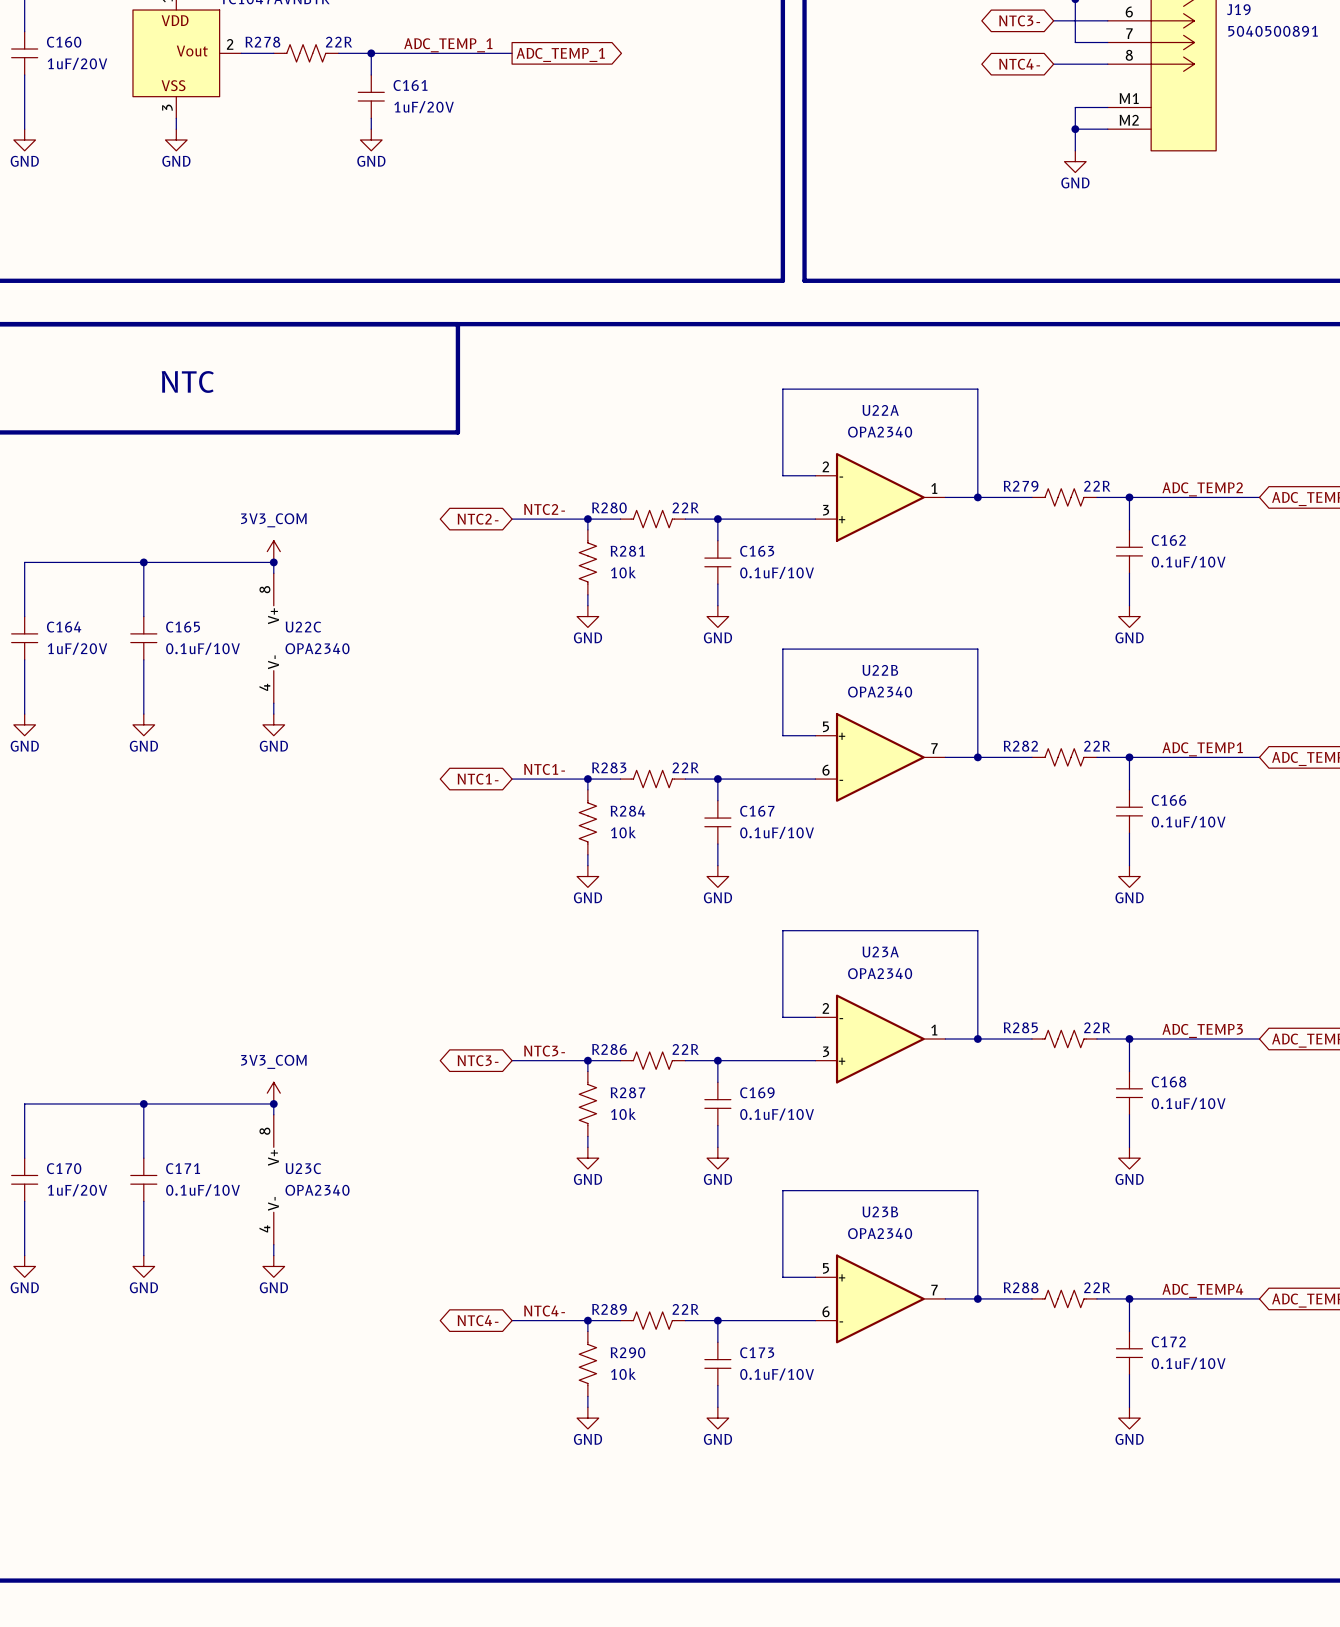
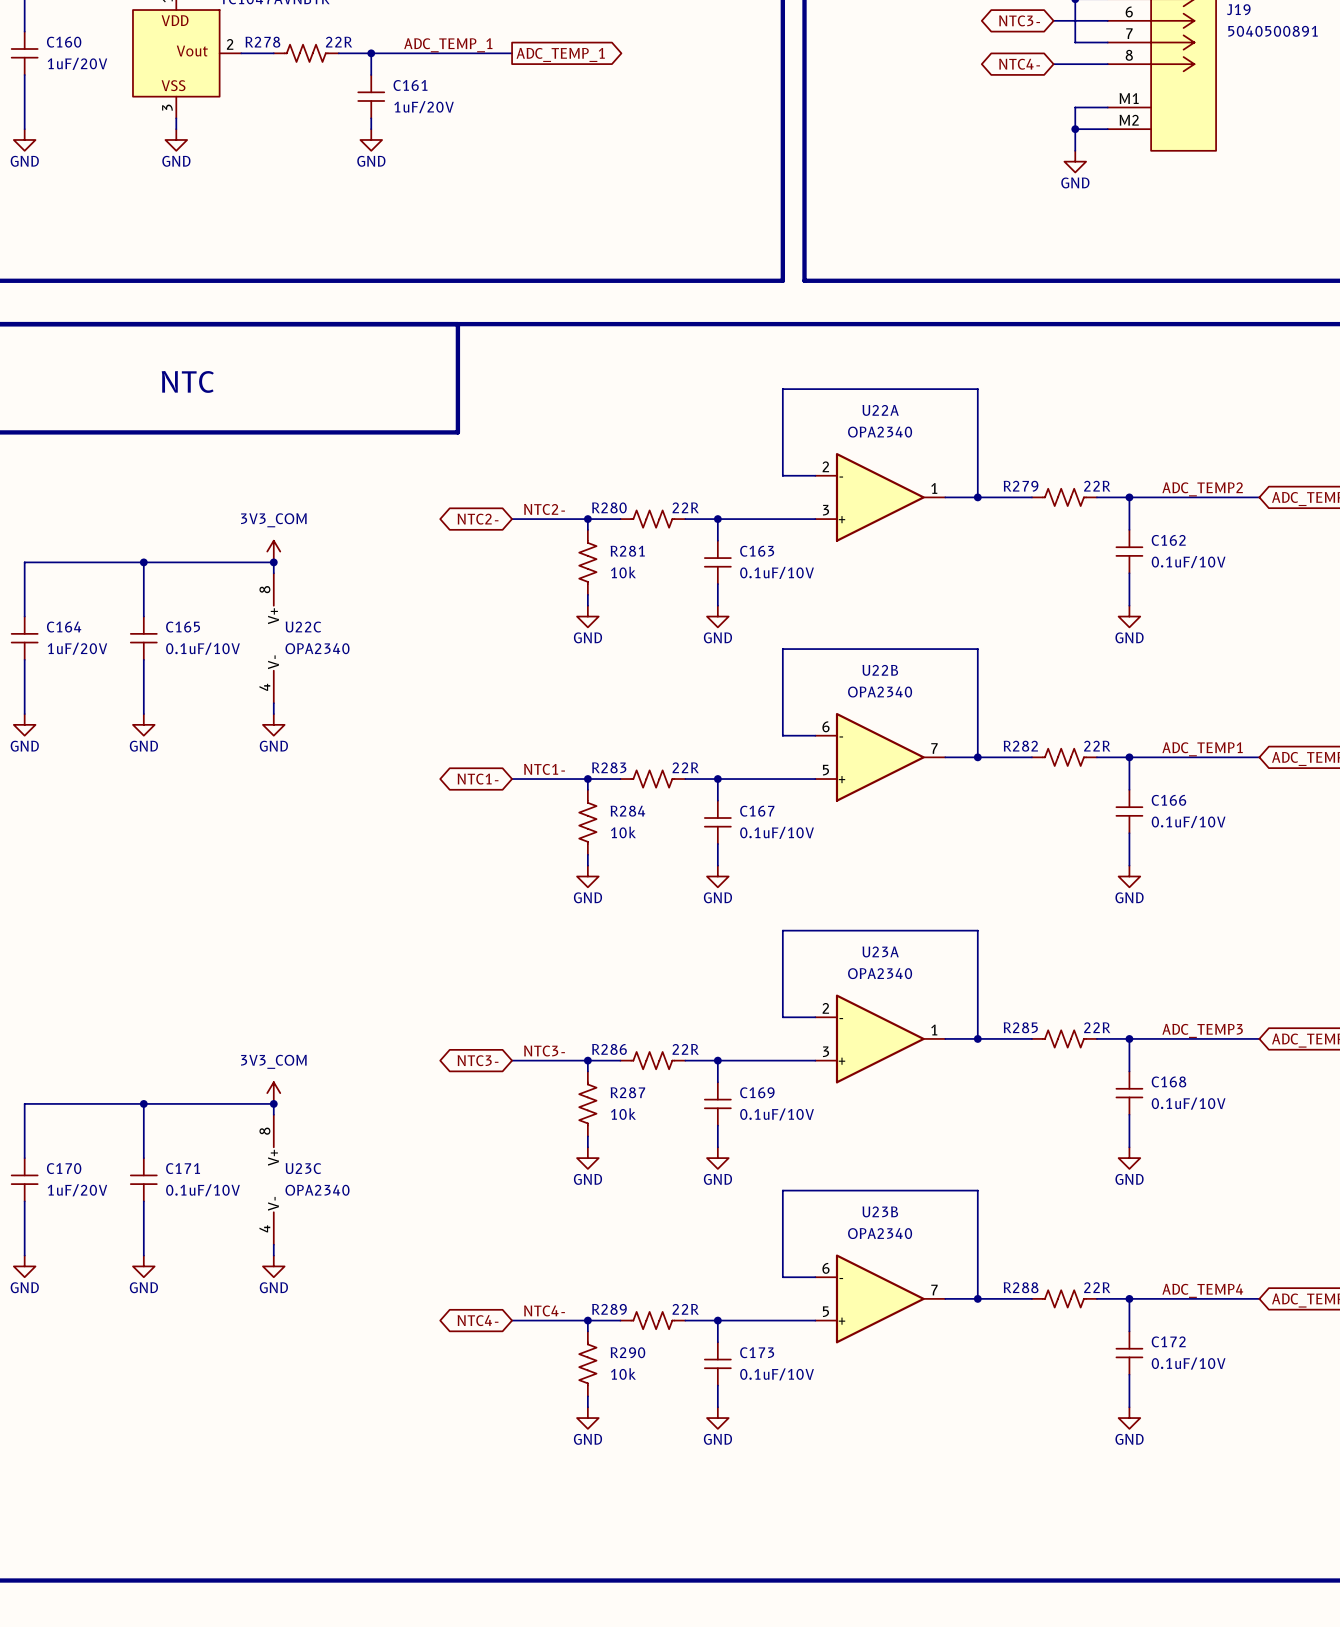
U22B flip: as is (880, 757) -> up-down (880, 757)
U23B flip: as is (880, 1298) -> up-down (880, 1298)

